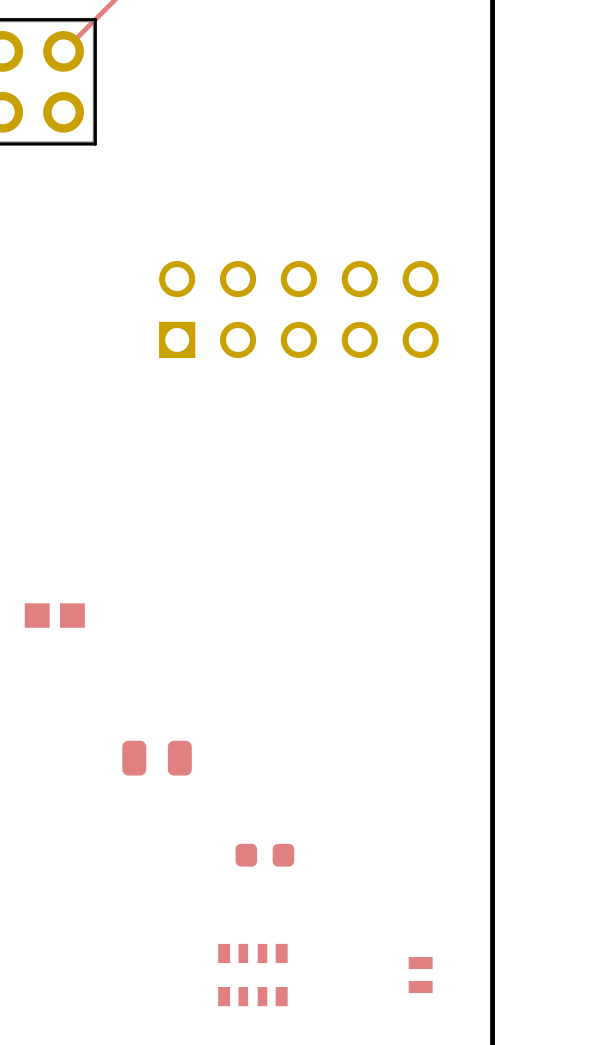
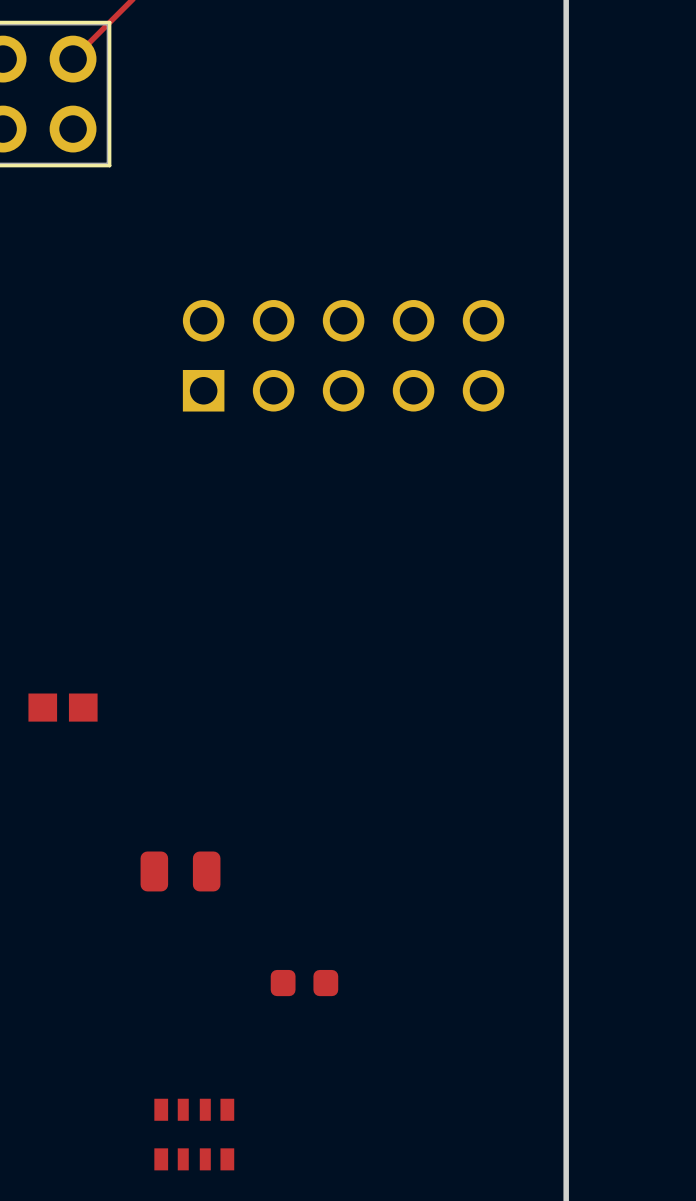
part position: (252, 975) -> (194, 1134)
part: (420, 975) -> none

